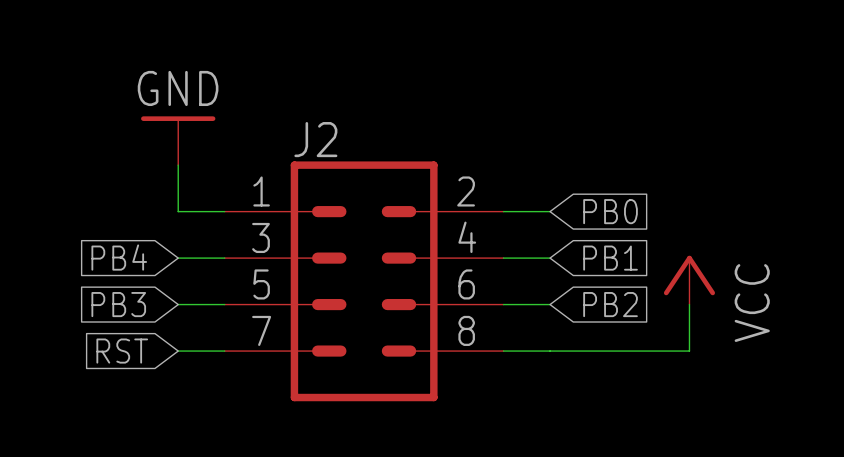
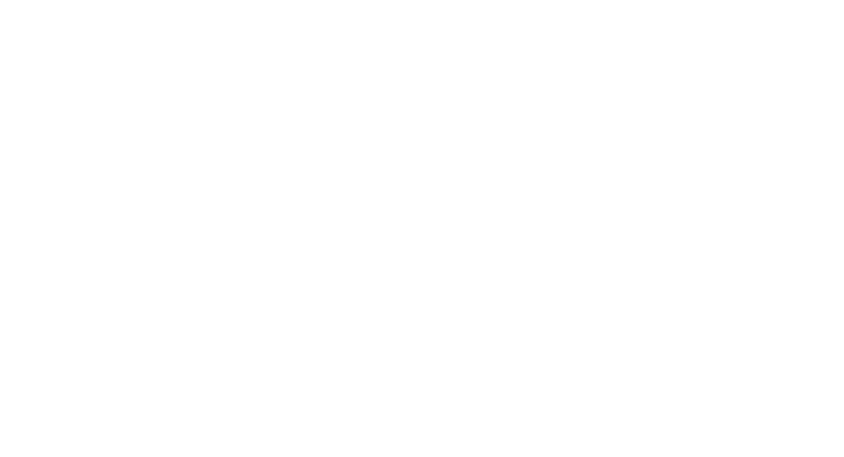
power symbol: GND (178, 140) -> none
wire: (178, 165) (178, 211) (224, 211) -> none
wire: (503, 211) (550, 211) -> none
global label: PB0 (610, 211) -> none
global label: PB4 (119, 257) -> none
wire: (178, 258) (224, 258) -> none
wire: (503, 258) (550, 258) -> none
global label: PB1 (610, 258) -> none
power symbol: VCC (689, 280) -> none
J2: (364, 281) -> none
global label: PB3 (118, 304) -> none
wire: (178, 304) (224, 304) -> none
wire: (503, 304) (550, 304) -> none
global label: PB2 (610, 304) -> none
wire: (689, 304) (689, 351) (503, 351) -> none
global label: RST (122, 351) -> none
wire: (178, 351) (224, 351) -> none

